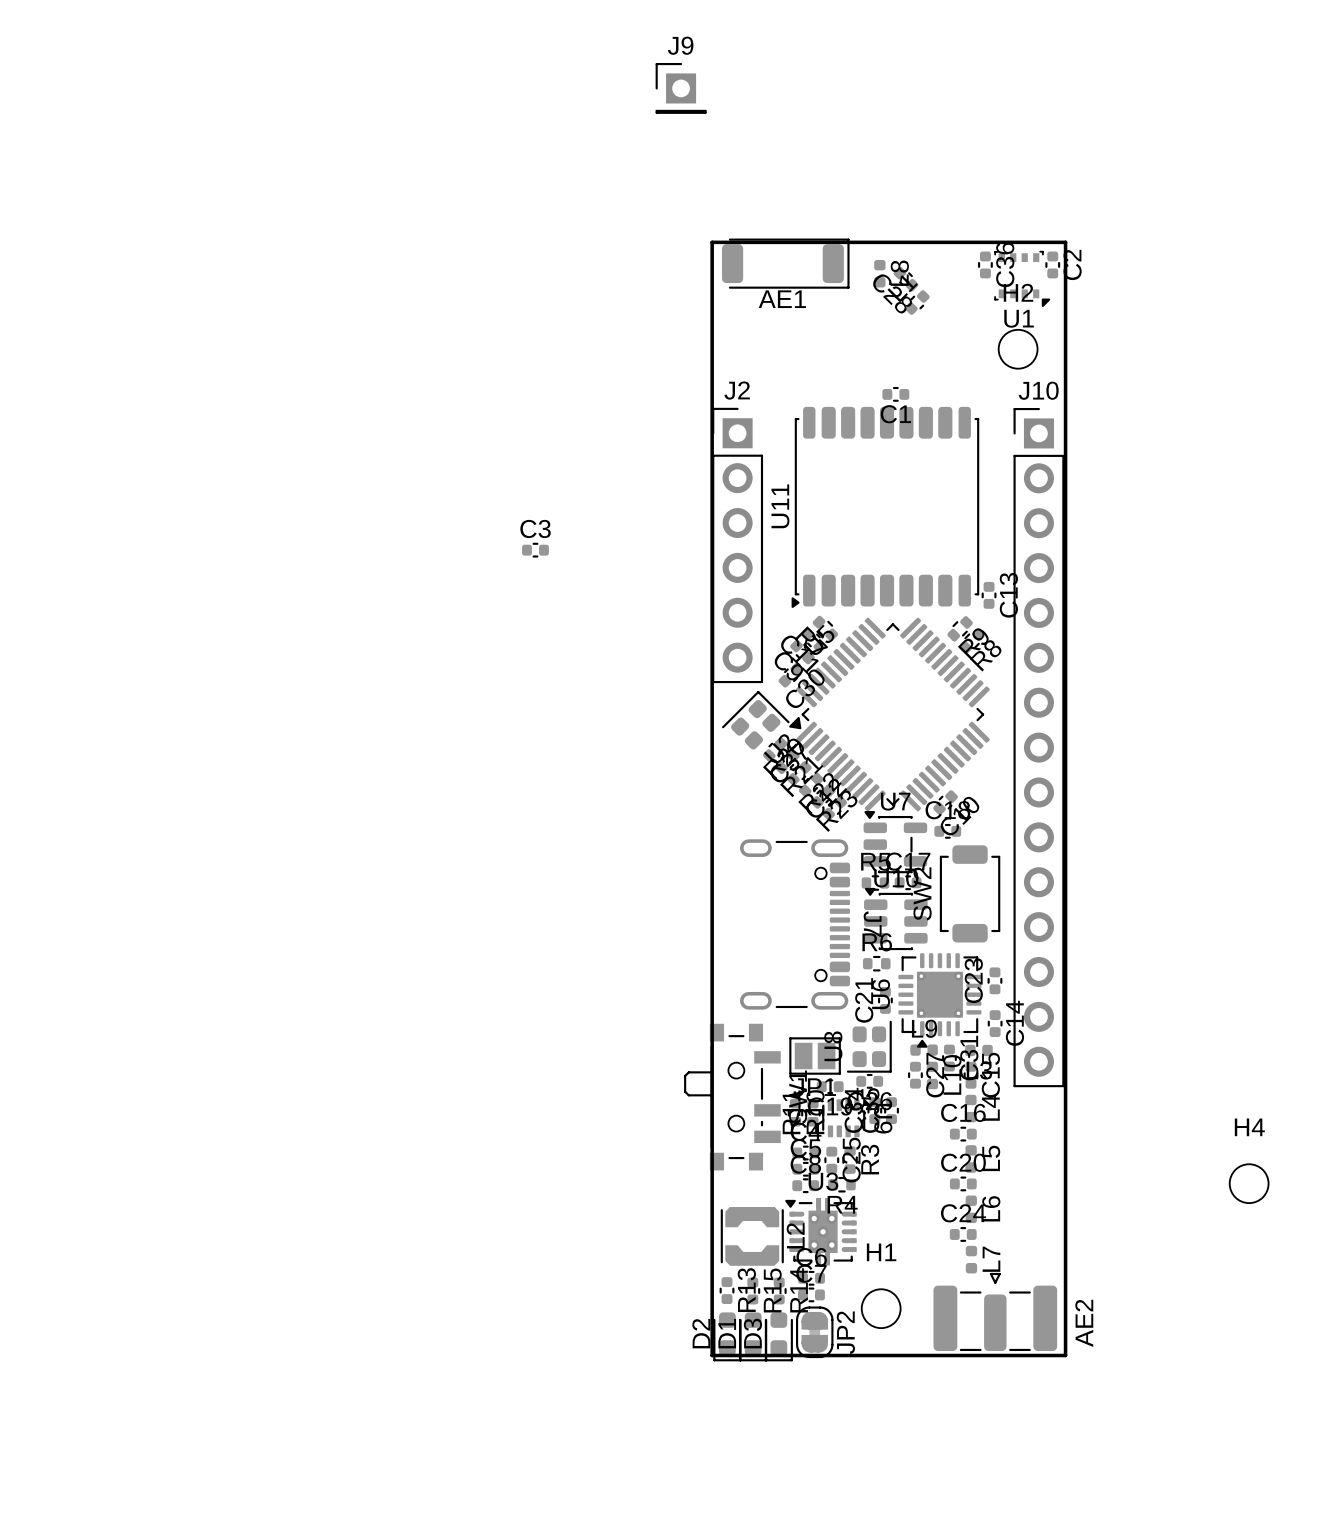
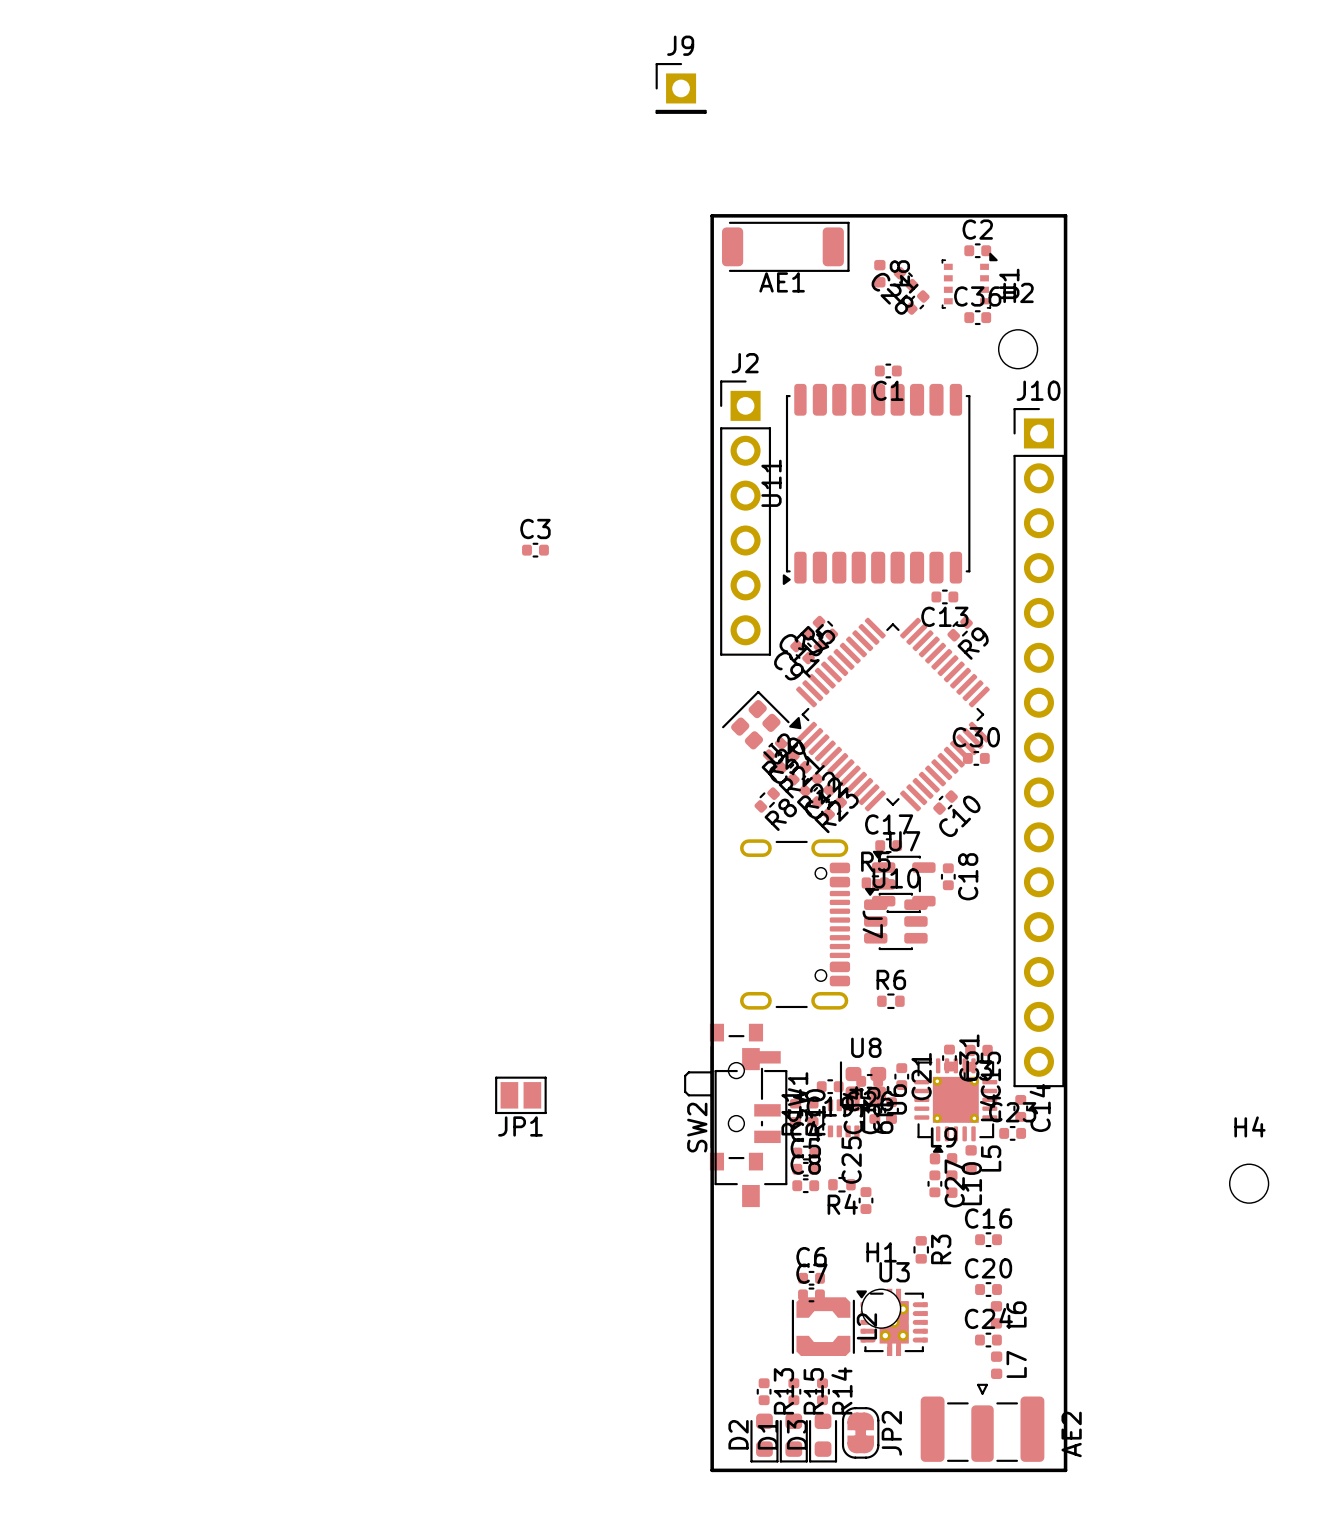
board edge: (712, 242) (1065, 242) -> (712, 242) (712, 215) (1065, 215) (1065, 242)
AE1 position: (785, 263) -> (785, 246)
C36 rotation: 0° (985, 264) -> 90° clockwise (977, 317)
C36 position: (985, 264) -> (977, 317)
C2 rotation: 0° (1052, 264) -> 90° clockwise (977, 250)
C2 position: (1052, 264) -> (977, 250)
U1 rotation: 0° (1022, 278) -> 90° counterclockwise (969, 280)
U1 position: (1022, 278) -> (969, 280)
C1 position: (895, 394) -> (888, 370)
U11 position: (885, 507) -> (876, 484)
J2 position: (737, 545) -> (745, 518)
C13 rotation: 0° (989, 595) -> 90° clockwise (944, 596)
C13 position: (989, 595) -> (944, 596)
R8 position: (972, 641) -> (767, 800)
C30 rotation: 0° (790, 675) -> 45° clockwise (976, 758)
C30 position: (790, 675) -> (976, 758)
C30 name position: C30 (805, 688) -> C30 (976, 737)
C18 rotation: 0° (947, 831) -> 90° clockwise (948, 876)
C18 position: (947, 831) -> (948, 876)
U7 position: (895, 842) -> (903, 881)
SW2 footprint: [939, 845, 1001, 943] -> [714, 1048, 788, 1208]
C17 position: (908, 882) -> (888, 845)
R6 position: (876, 963) -> (890, 1001)
C23 rotation: 0° (994, 980) -> 90° clockwise (1012, 1133)
C23 position: (994, 980) -> (1012, 1133)
C21 name position: C21 (864, 1000) -> C21 (921, 1076)
C21 position: (885, 1000) -> (901, 1076)
U6 position: (939, 1000) -> (955, 1105)
C14 position: (995, 1023) -> (1020, 1108)
U8 rotation: 0° (869, 1046) -> 90° clockwise (865, 1083)
U8 position: (869, 1046) -> (865, 1083)
L9 position: (924, 1050) -> (943, 1158)
JP1 position: (815, 1056) -> (520, 1095)
C27 position: (915, 1075) -> (934, 1183)
L10 position: (932, 1075) -> (951, 1184)
C16 position: (963, 1134) -> (988, 1239)
C25 position: (831, 1160) -> (865, 1200)
R3 position: (850, 1160) -> (921, 1249)
C20 position: (963, 1183) -> (988, 1289)
L6 position: (971, 1209) -> (996, 1314)
U3 position: (820, 1231) -> (892, 1322)
C24 position: (963, 1234) -> (988, 1340)
L2 position: (752, 1236) -> (823, 1326)
L7 position: (971, 1259) -> (996, 1365)
R13 position: (727, 1290) -> (764, 1391)
R15 position: (752, 1291) -> (793, 1391)
R14 position: (779, 1291) -> (822, 1391)
AE2 position: (995, 1311) -> (982, 1422)
JP2 position: (814, 1332) -> (860, 1432)
D2 position: (727, 1336) -> (764, 1438)
D1 position: (753, 1336) -> (793, 1438)
D3 position: (778, 1336) -> (823, 1438)
board edge: (712, 1355) (1065, 1355) -> (712, 1355) (712, 1470) (1065, 1470) (1065, 1355)

